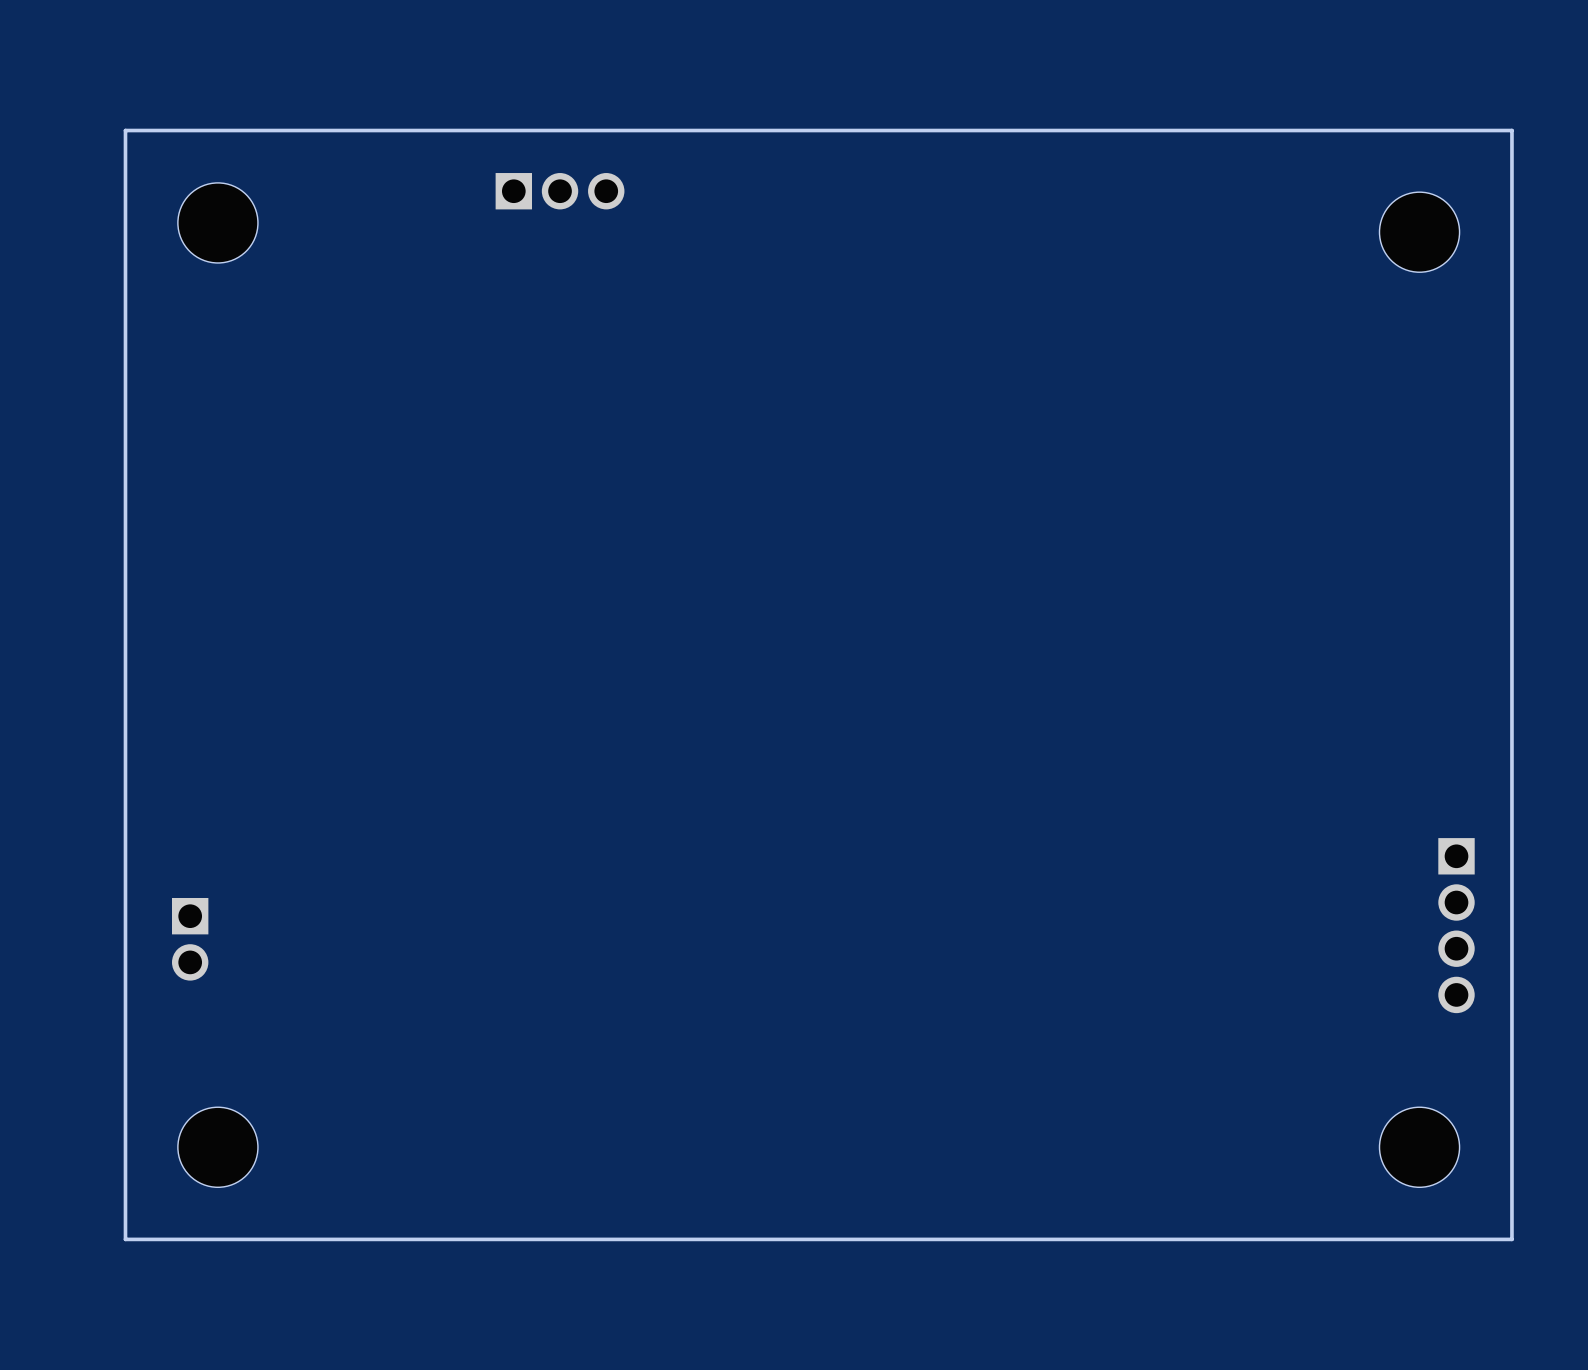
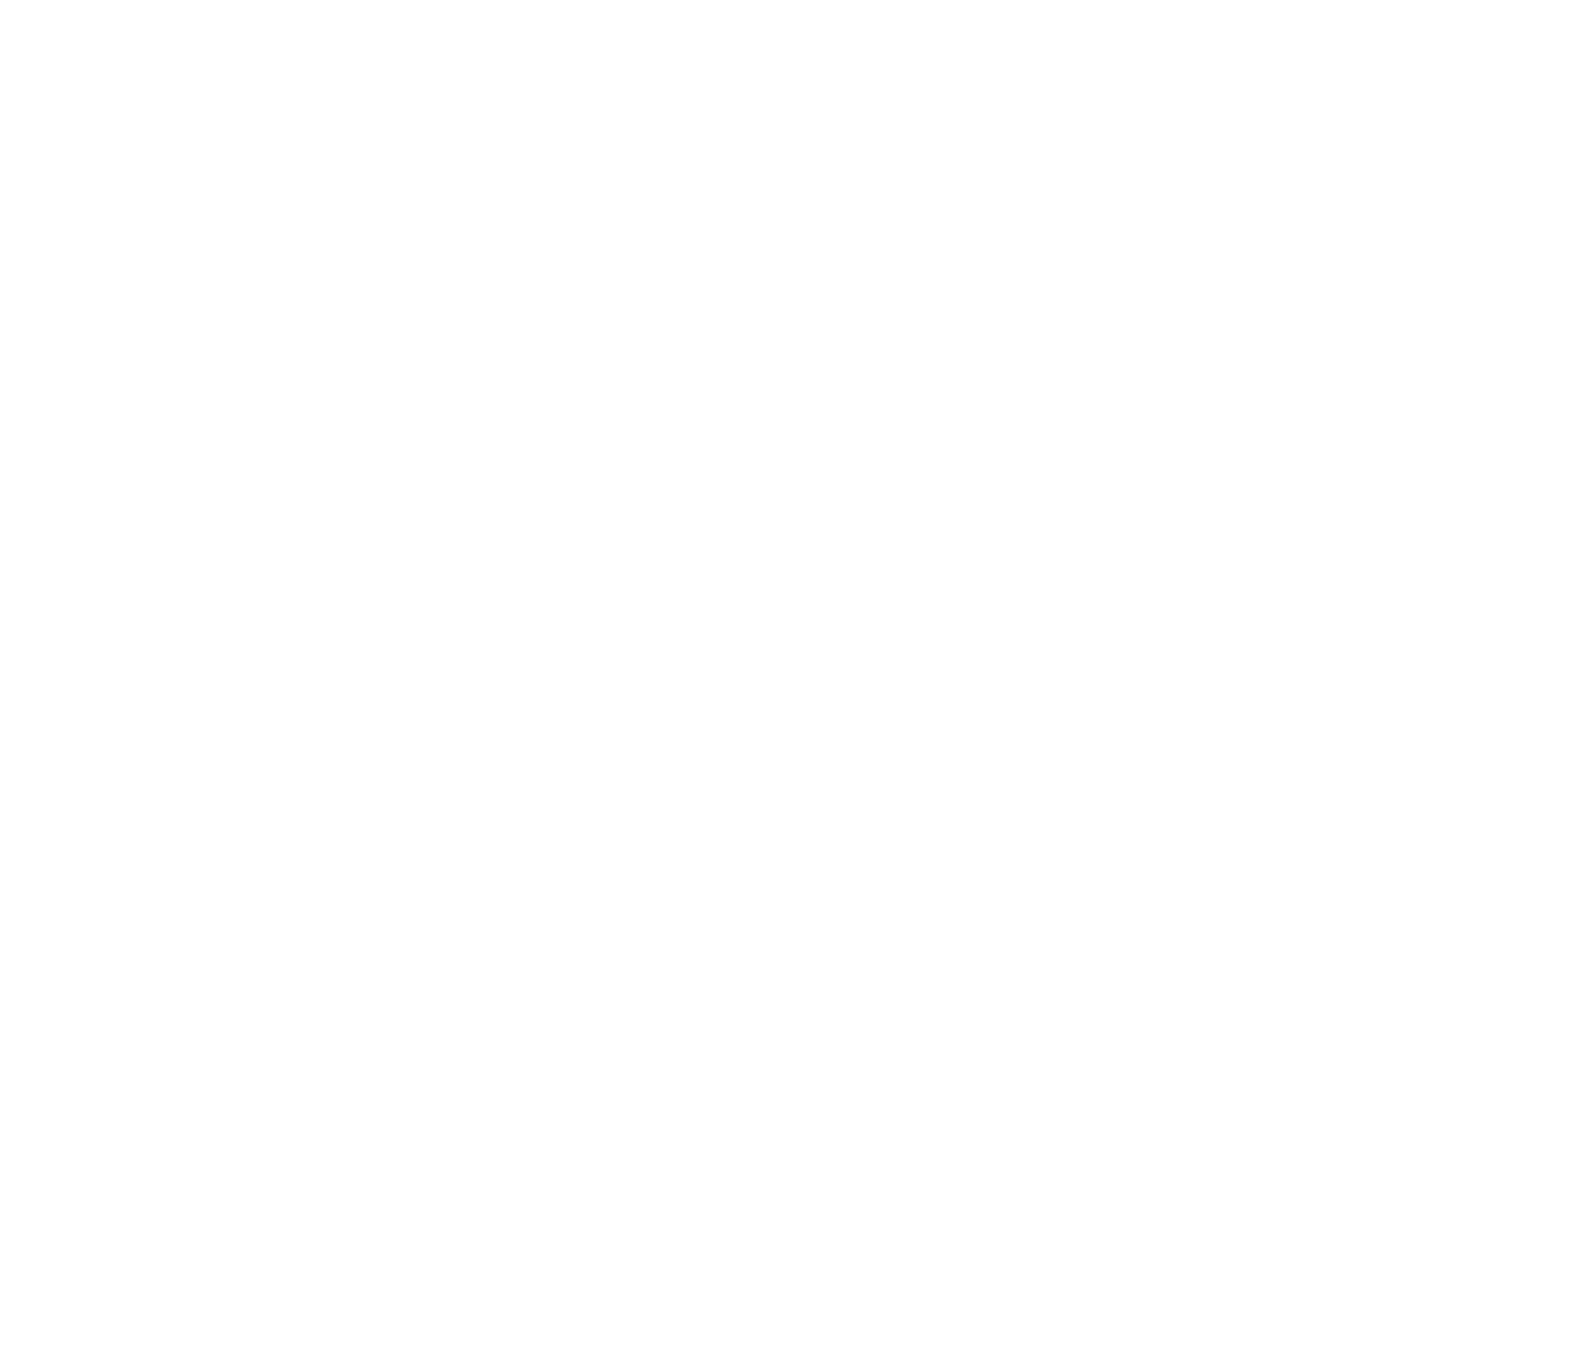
board edge: (1511, 130) (1511, 1239) (125, 1239) (125, 130) (1511, 130) -> none
part: (560, 191) -> none
part: (217, 222) -> none
part: (1419, 232) -> none
part: (1456, 925) -> none
part: (190, 939) -> none
part: (217, 1147) -> none
part: (1419, 1147) -> none

